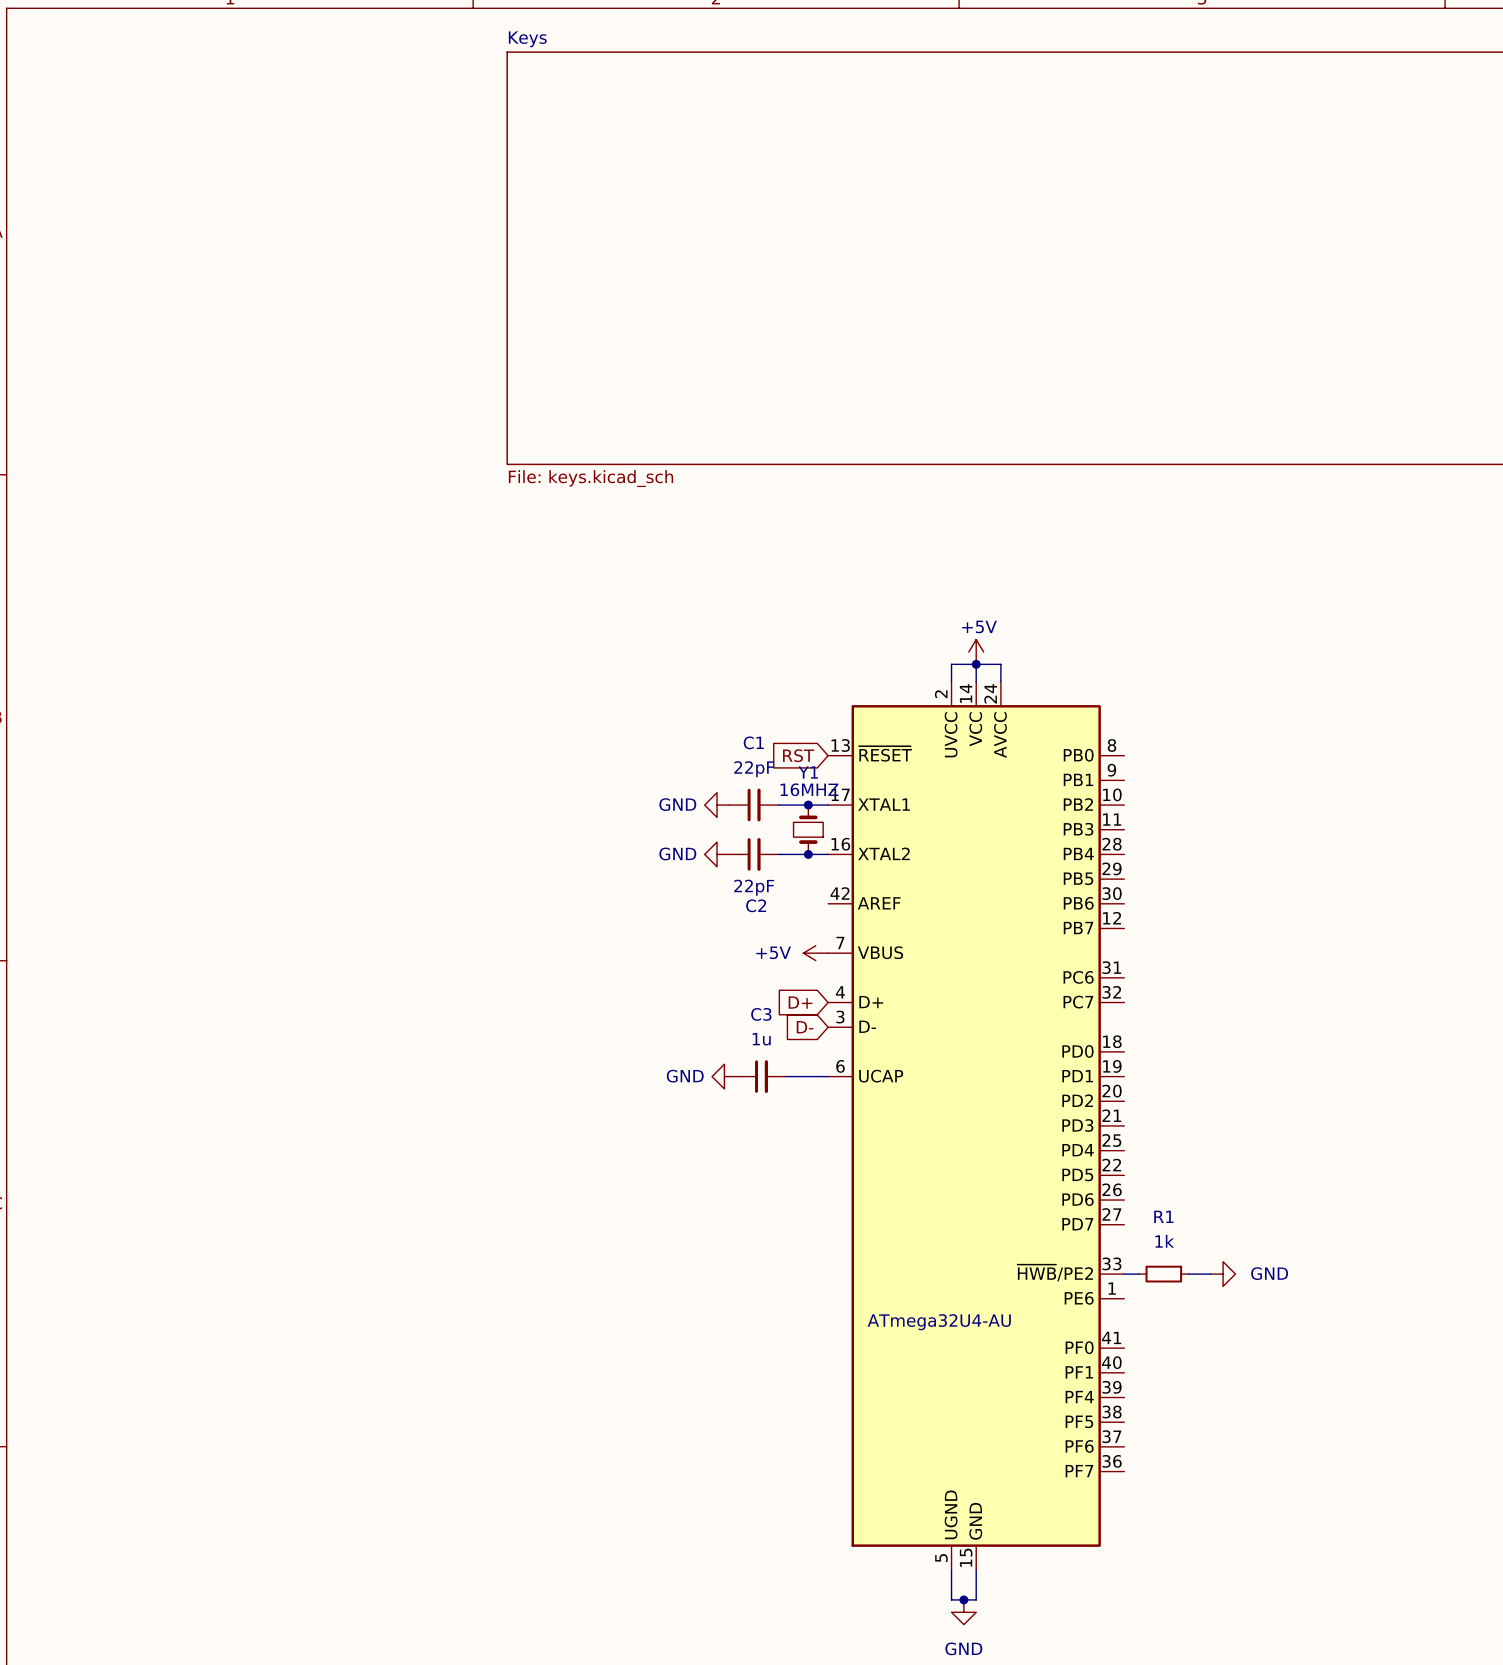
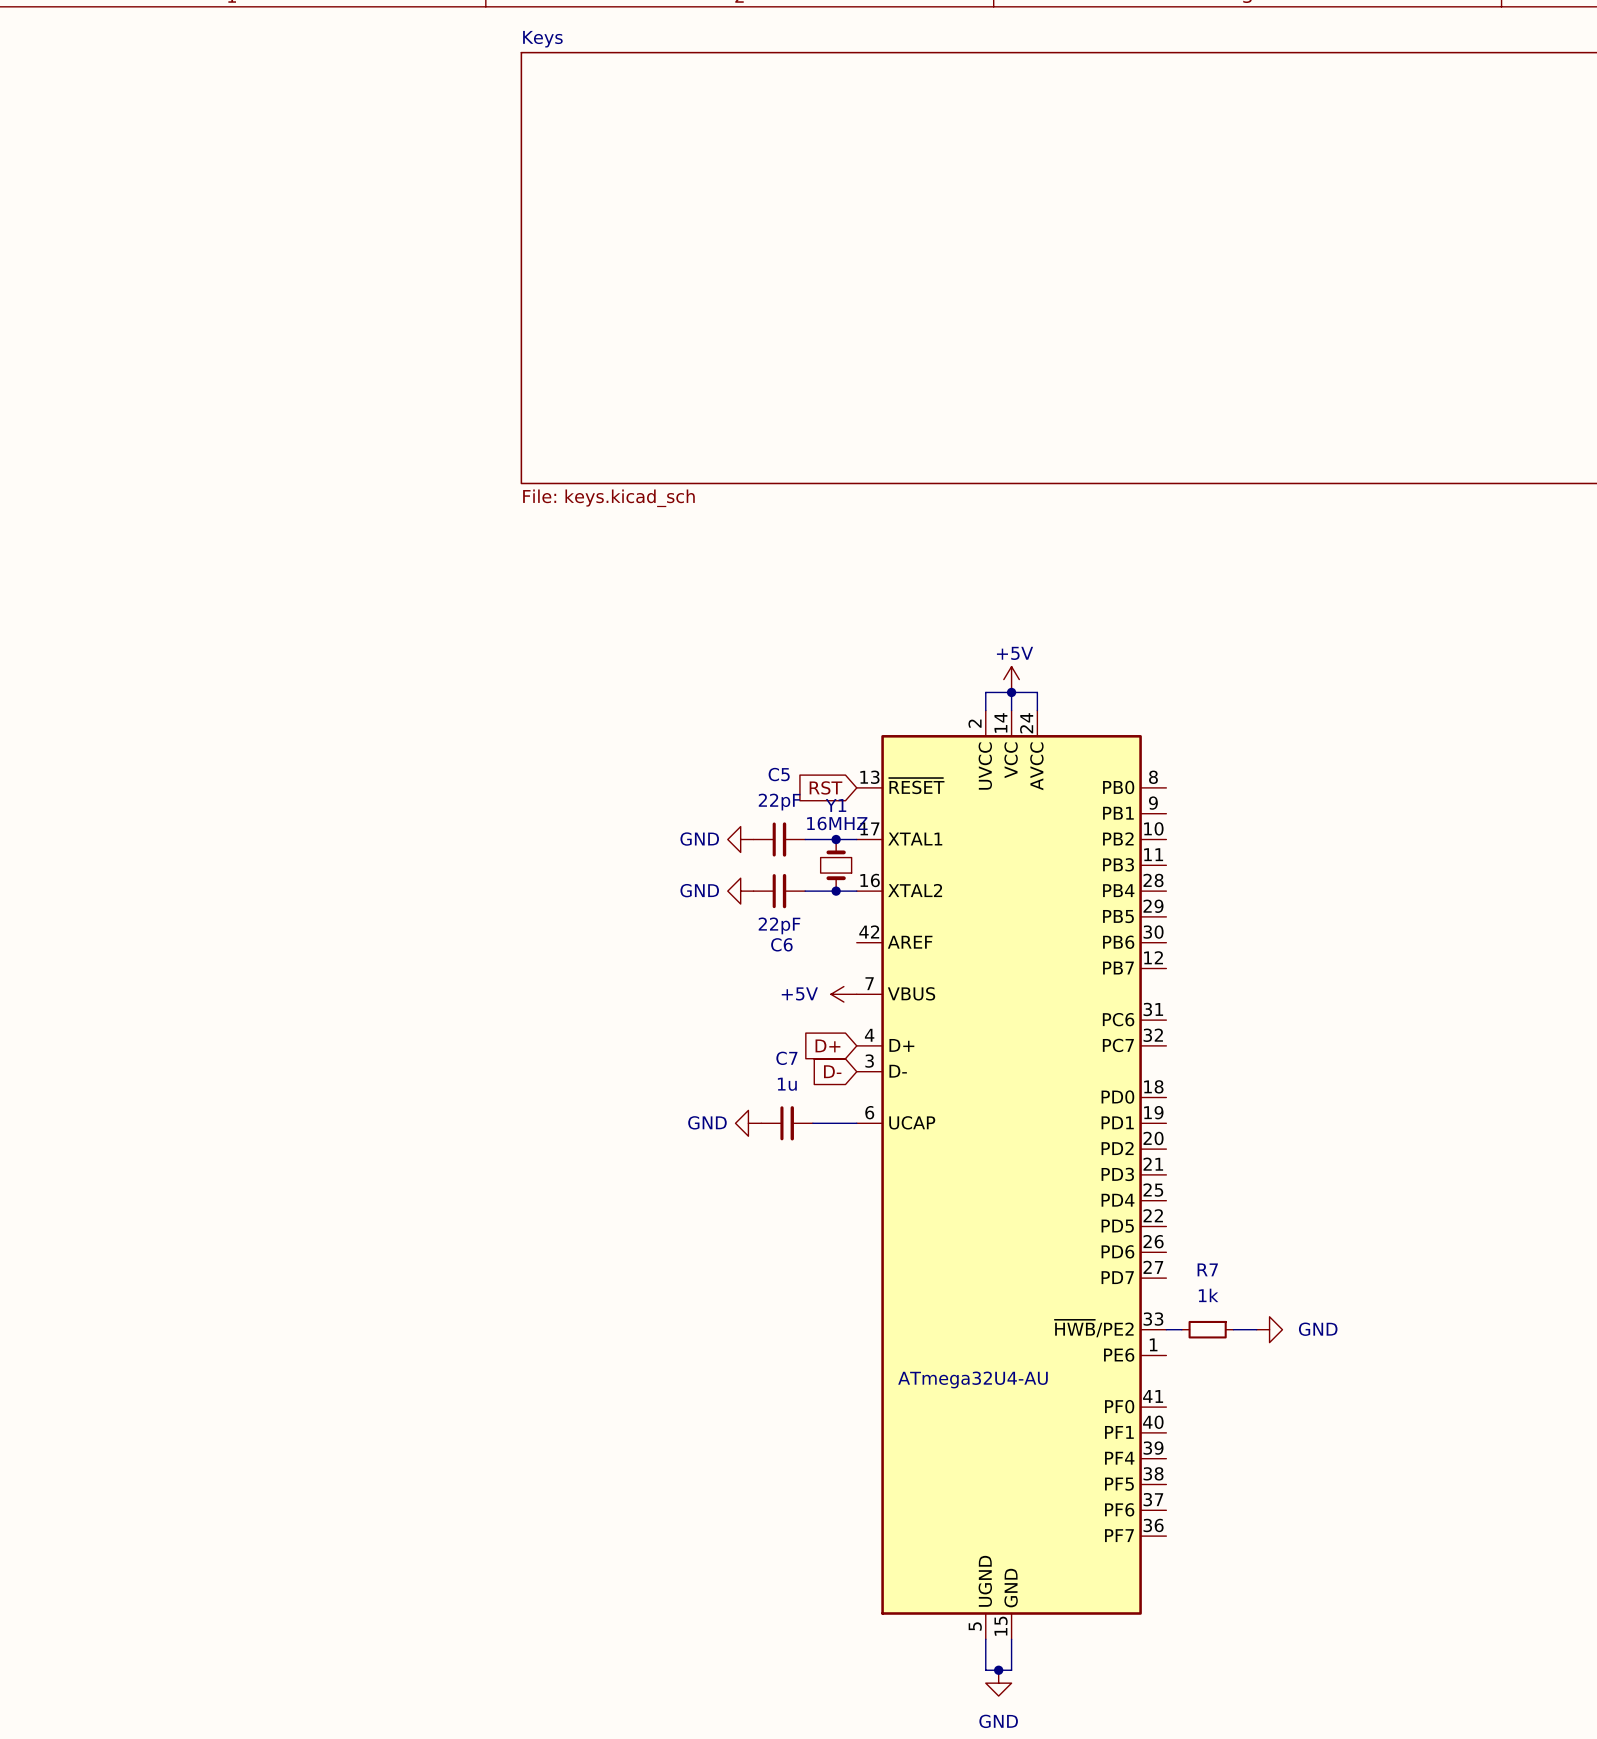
C1 name: C1 (753, 742) -> C5 (779, 774)
C2 name: C2 (756, 905) -> C6 (781, 944)
C3 name: C3 (761, 1014) -> C7 (786, 1058)
R1 name: R1 (1163, 1216) -> R7 (1207, 1269)

